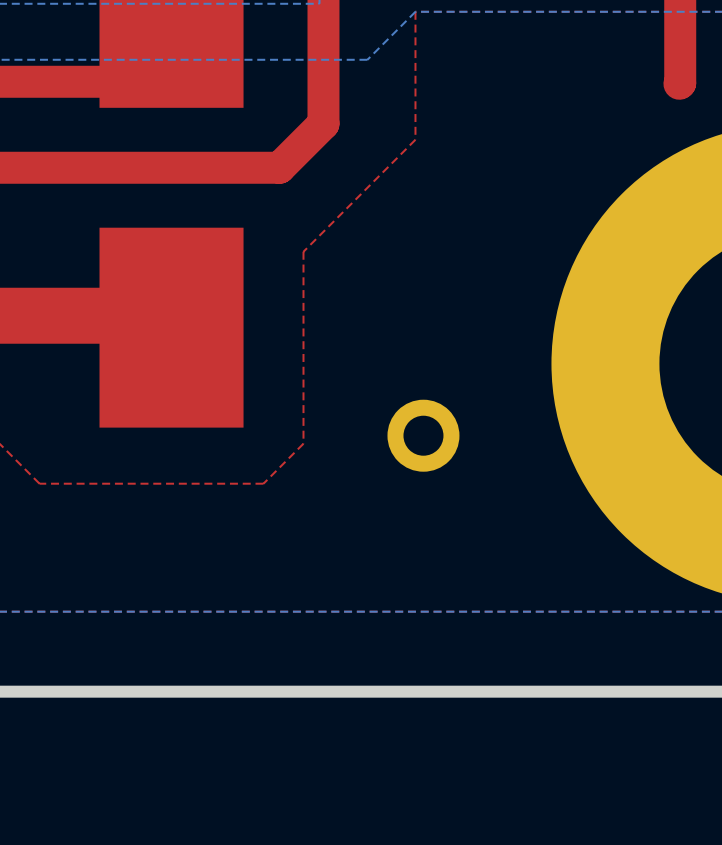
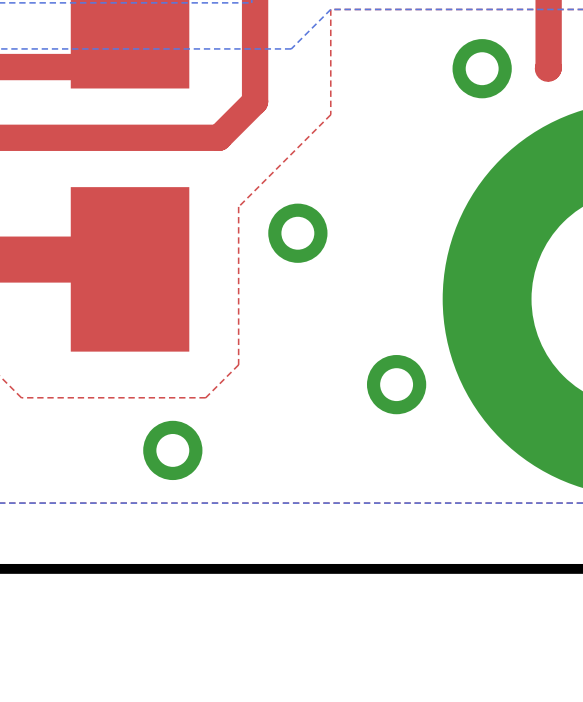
part: none -> (482, 68)
part: none -> (297, 233)
part position: (423, 435) -> (396, 384)
part: none -> (172, 450)

